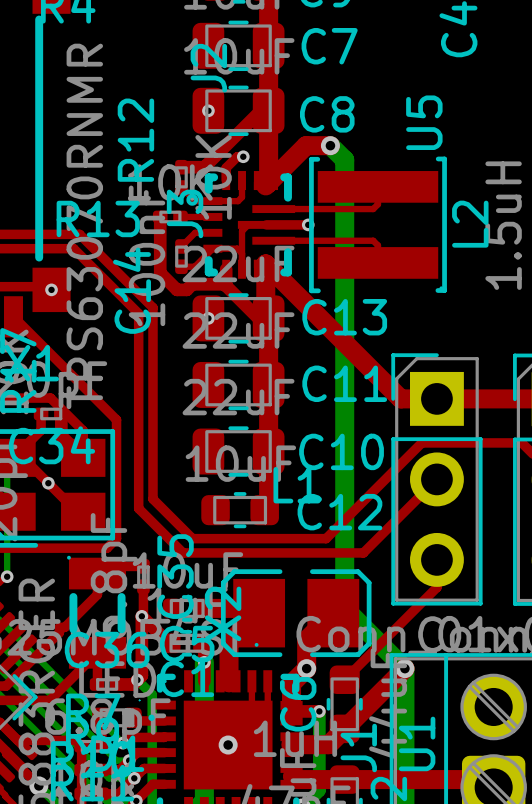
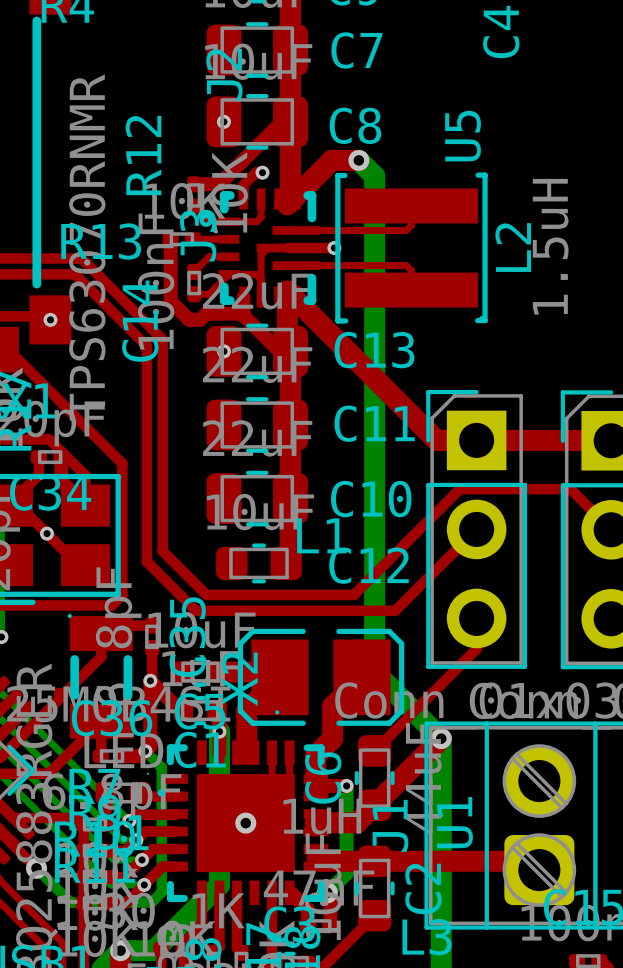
via: (306, 668) -> none

